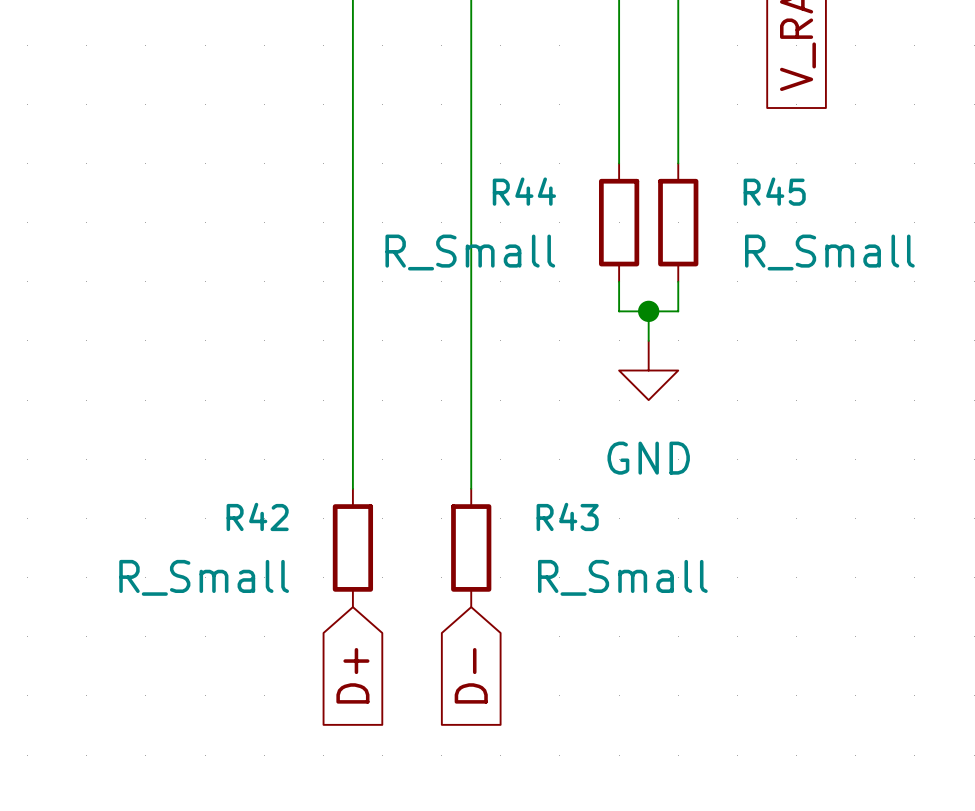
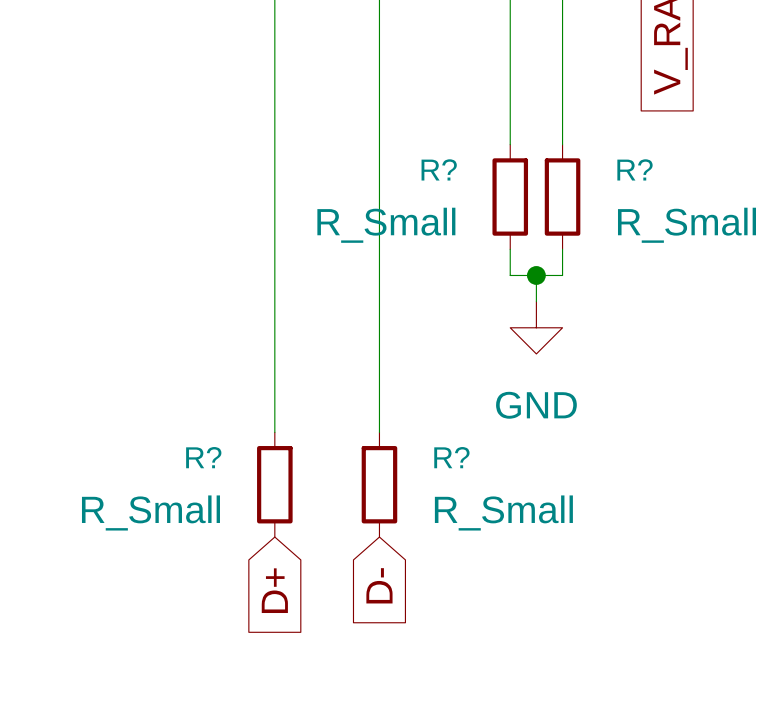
R44 name: R44 (524, 191) -> R? (439, 169)
R45 name: R45 (774, 191) -> R? (634, 169)
R42 name: R42 (257, 516) -> R? (203, 457)
R43 name: R43 (567, 516) -> R? (451, 457)

